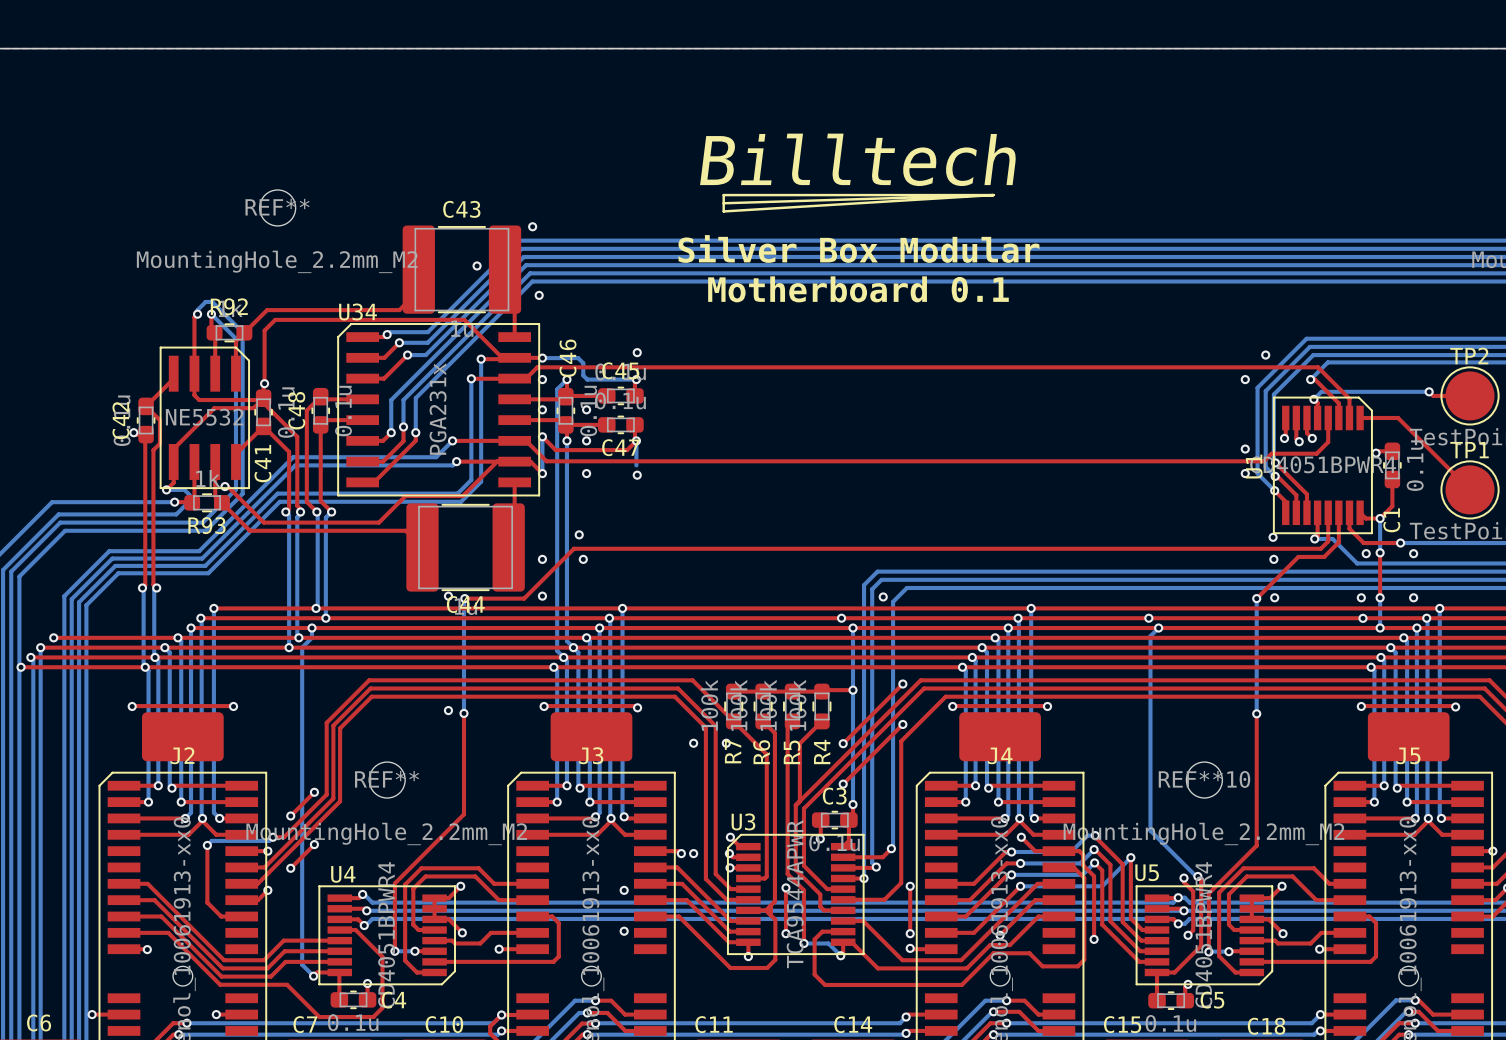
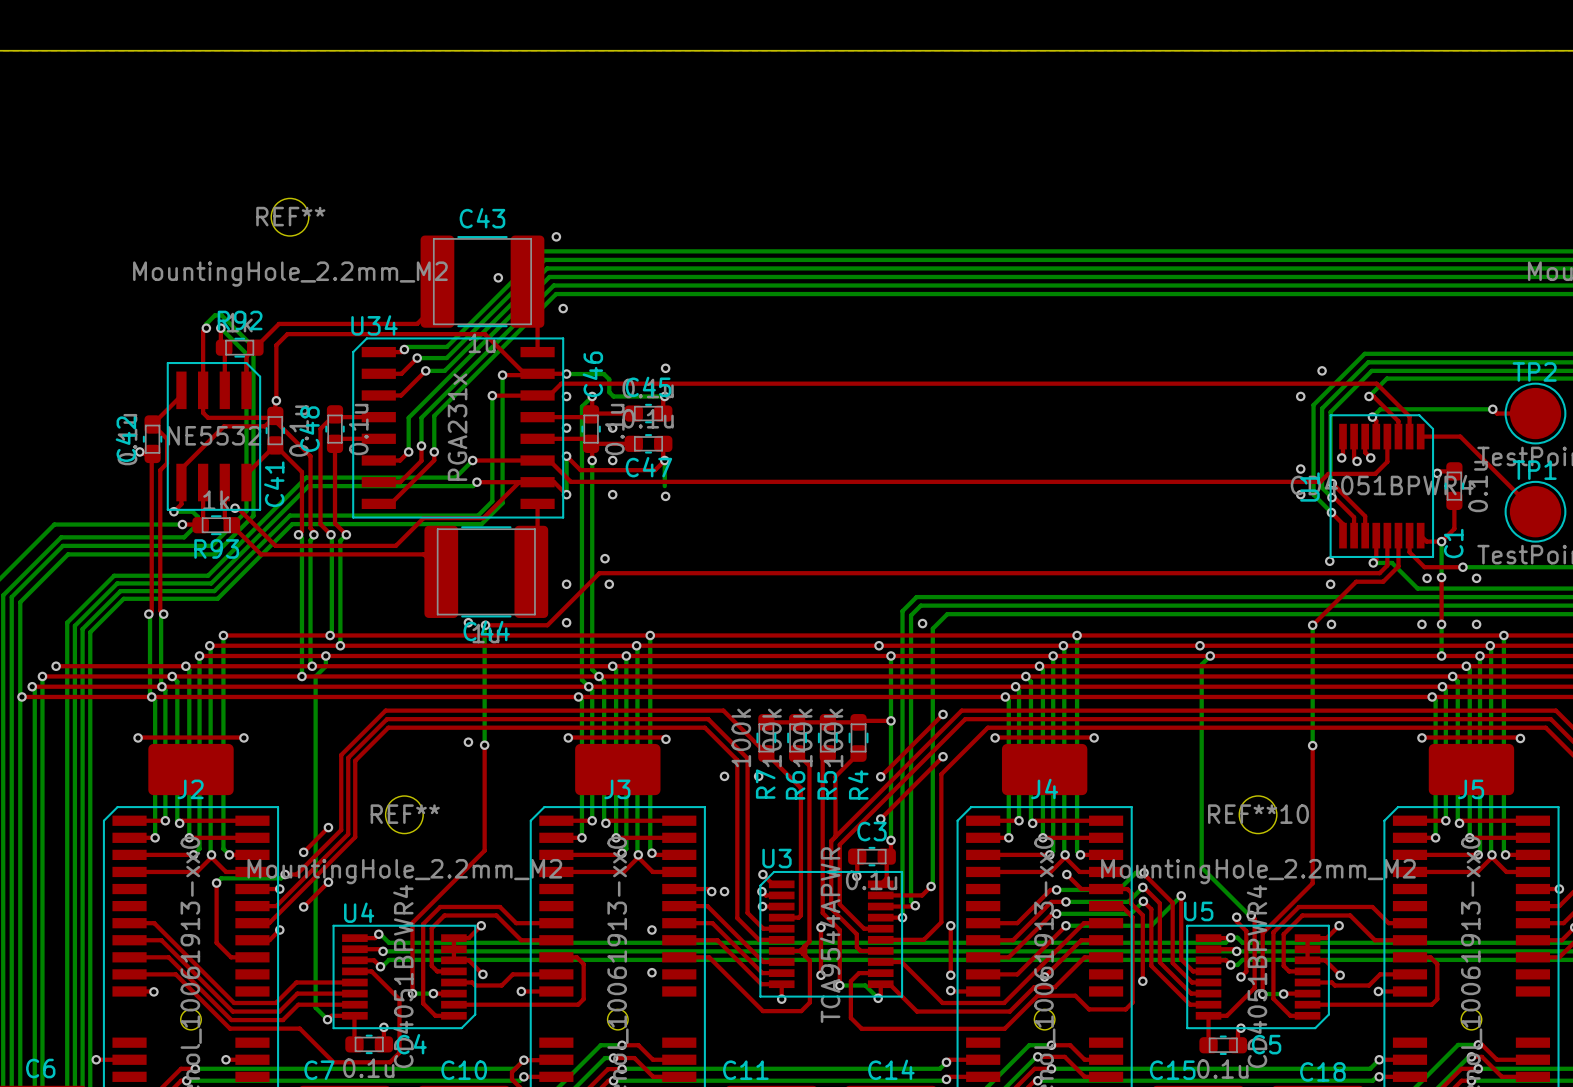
drawing: [722, 193, 995, 213] -> none
text: Silver Box Modular (858, 248) -> none
text: Motherboard 0.1 (858, 289) -> none
via: (1362, 618) -> none

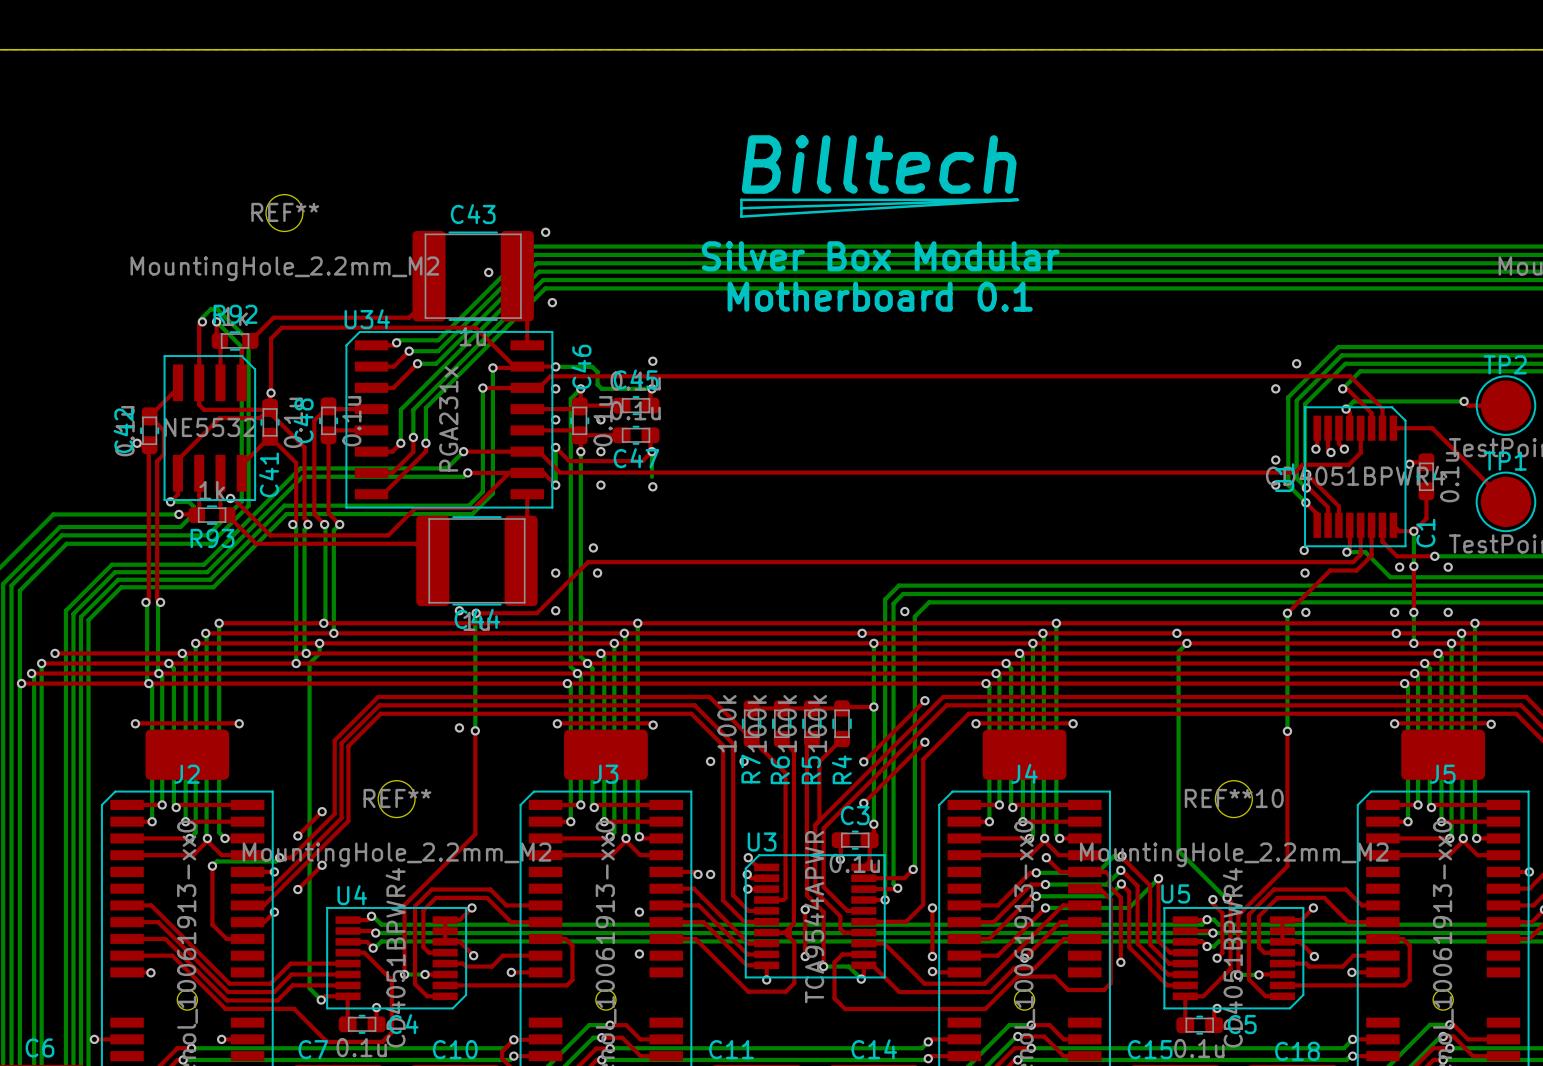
drawing: none -> [740, 198, 1019, 218]
text: none -> Silver Box Modular (880, 256)
text: none -> Motherboard 0.1 (880, 296)
via: none -> (1396, 633)

